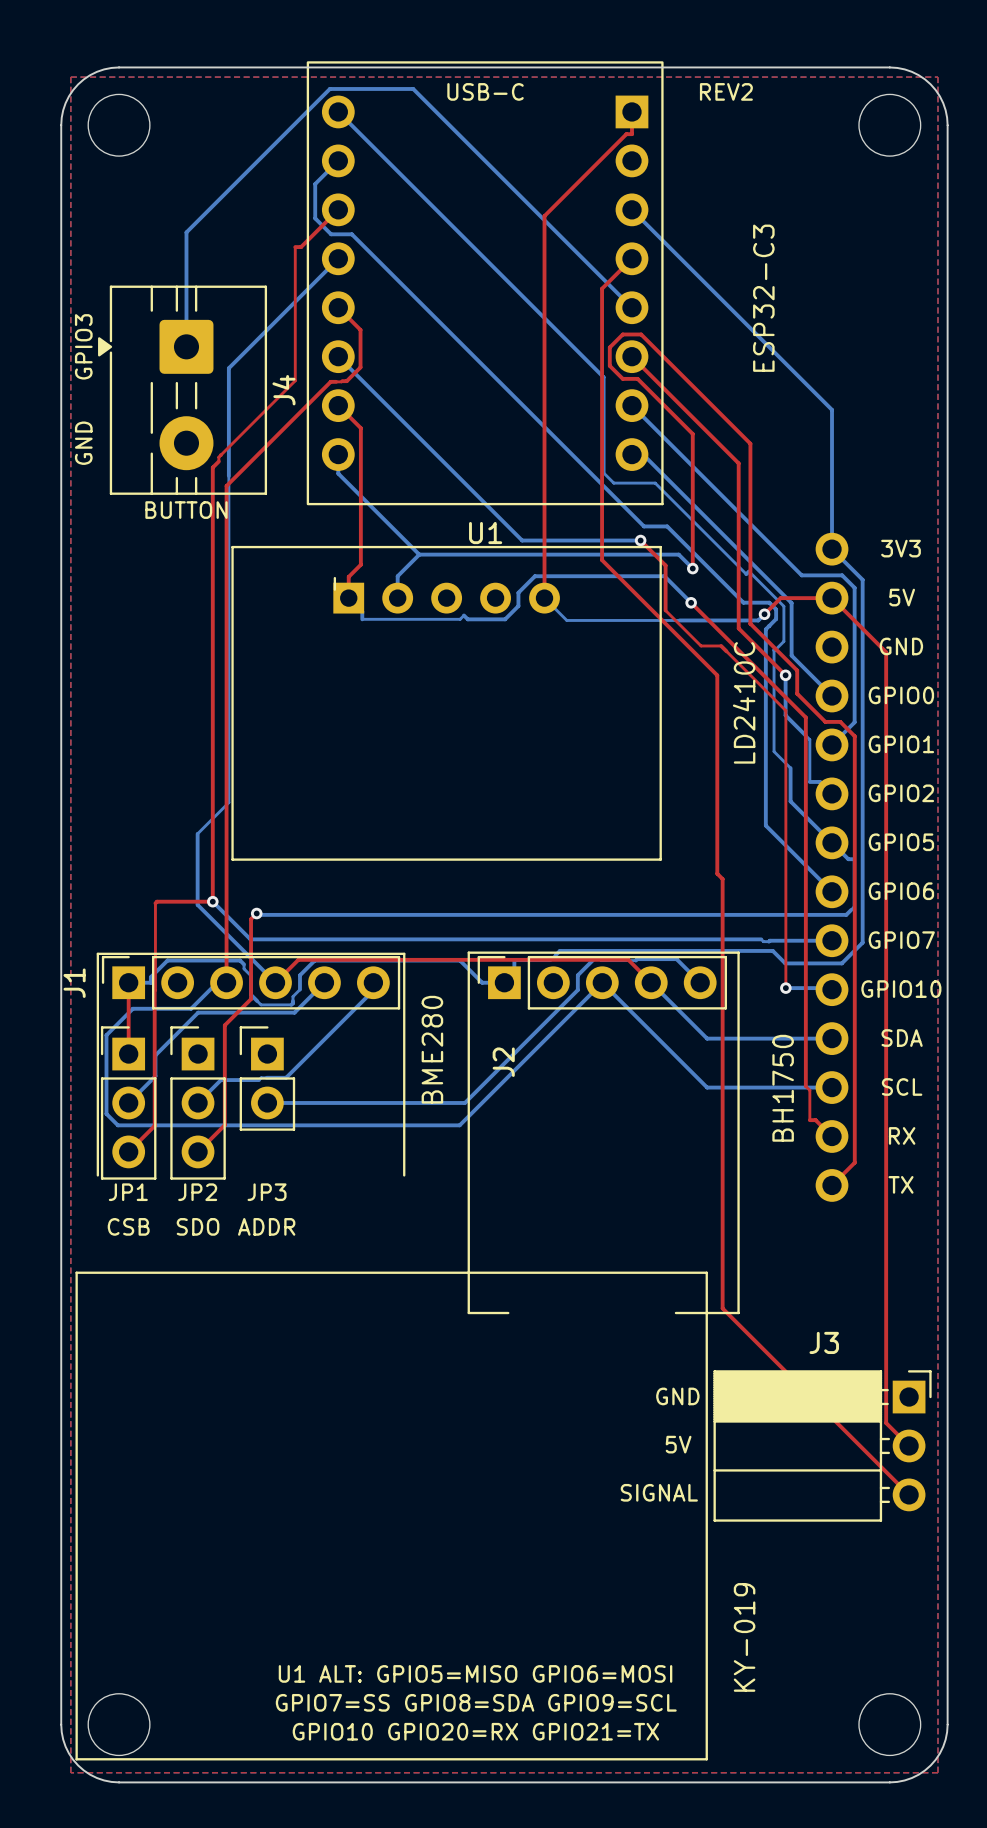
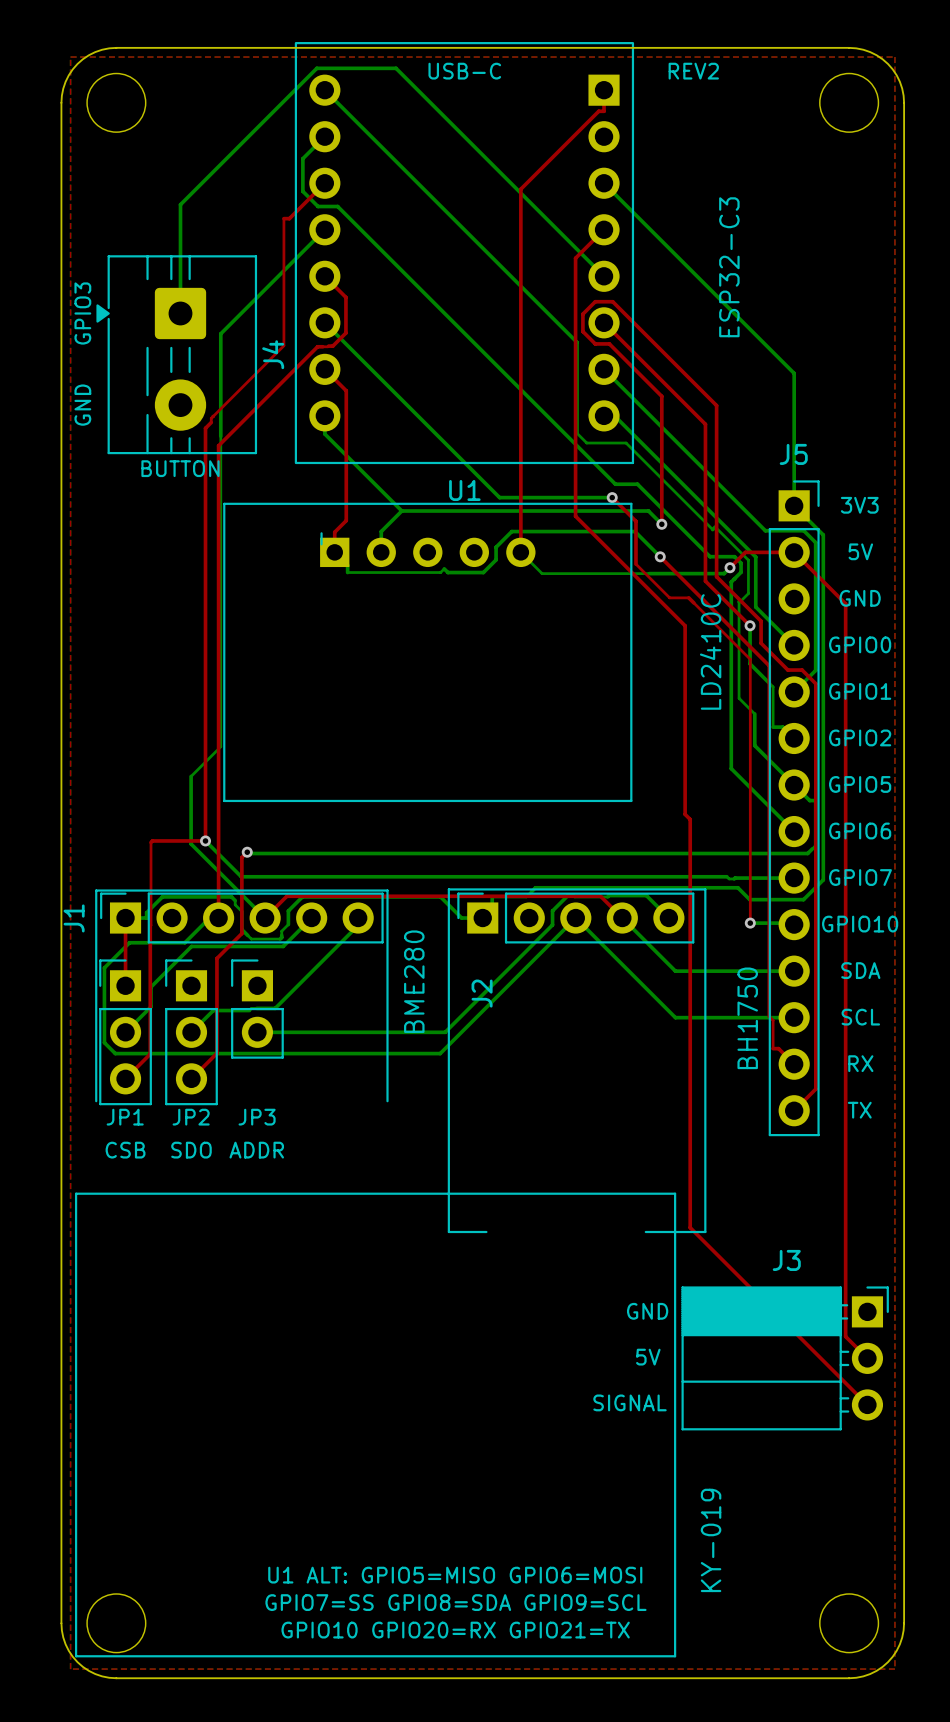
part: (832, 867) -> none
J5: none -> (794, 808)

